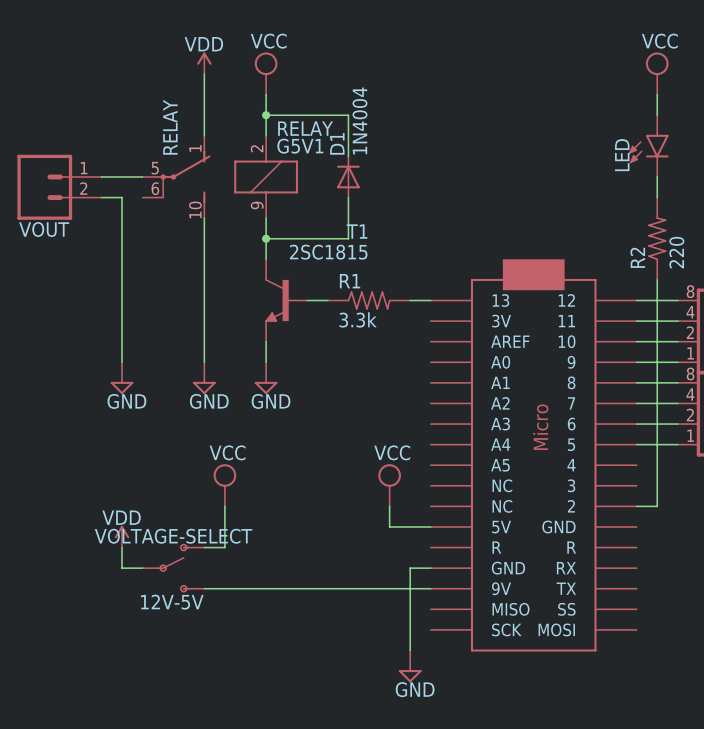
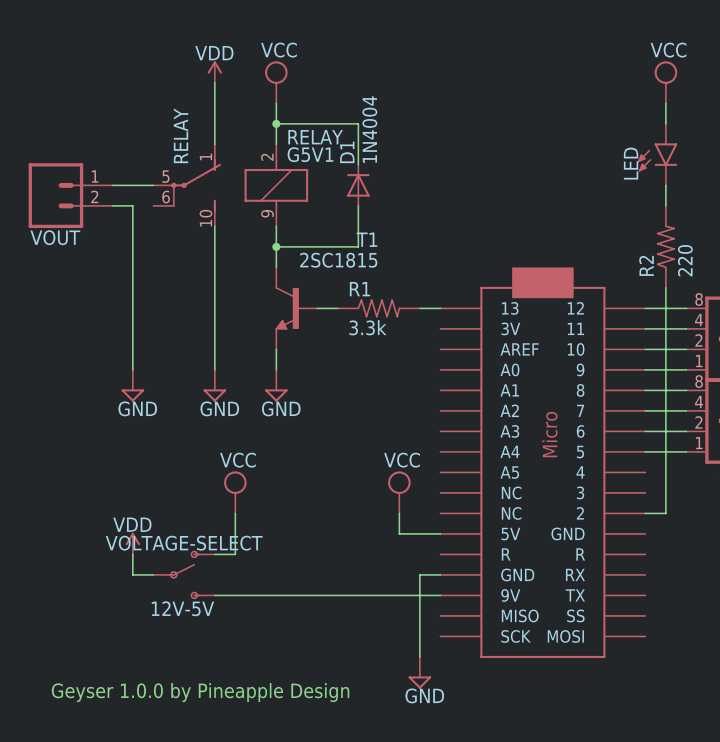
text: none -> Geyser 1.0.0 by Pineapple Design (200, 692)

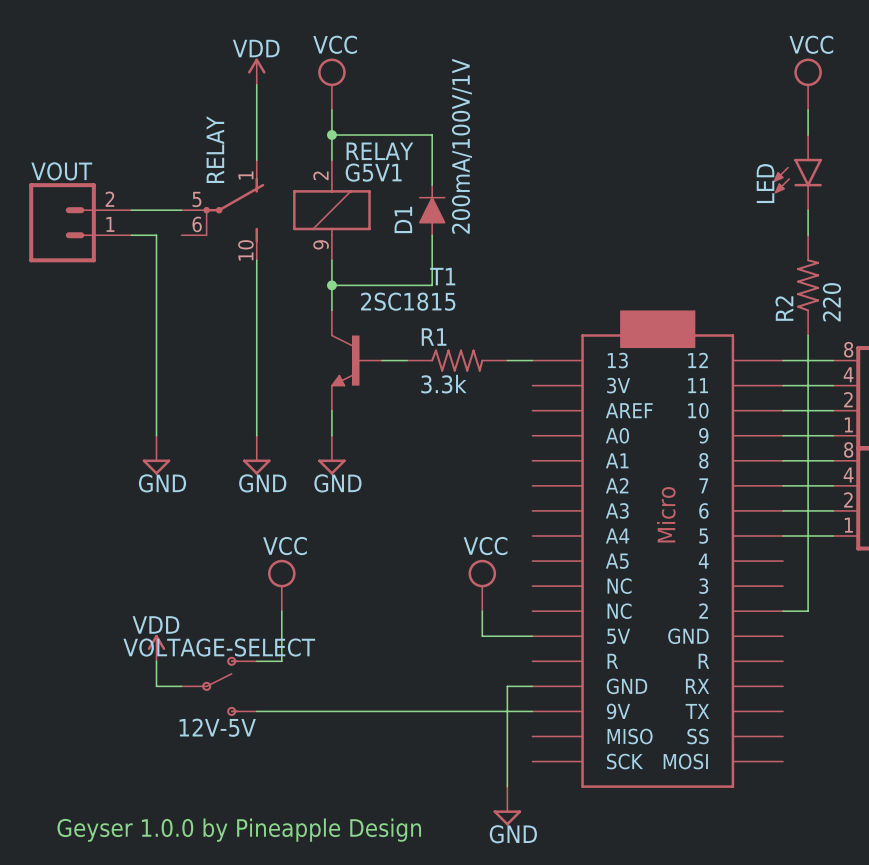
D1 value: 1N4004 (369, 129) -> 200mA/100V/1V (461, 146)
D1 name position: D1 (347, 152) -> D1 (403, 219)
D1 symbol: [347, 164, 370, 206] -> [418, 184, 446, 237]
VOUT flip: as is (55, 195) -> up-down (62, 222)

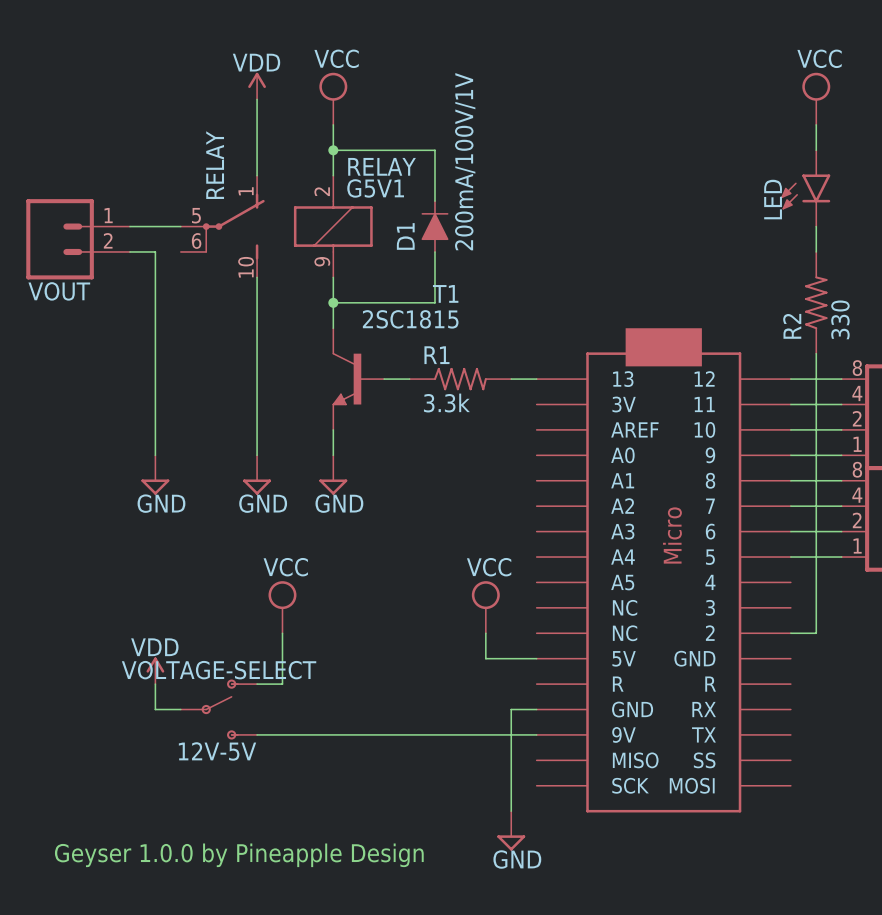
VOUT flip: as is (62, 222) -> up-down (60, 239)
R2 value: 220 (831, 302) -> 330 (840, 319)

